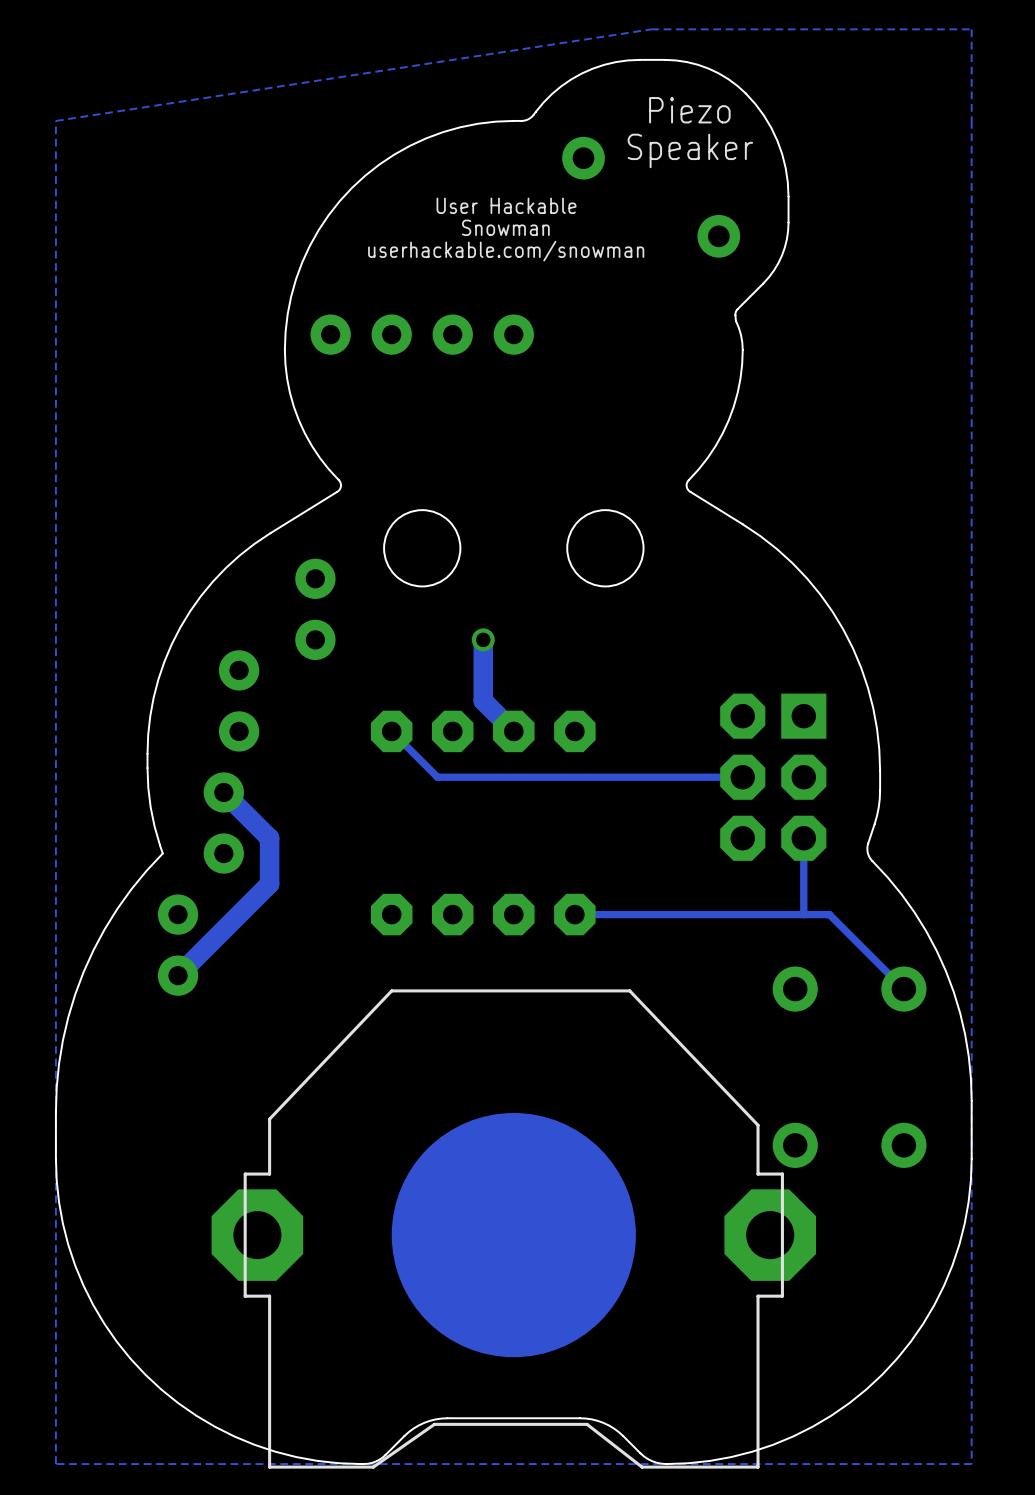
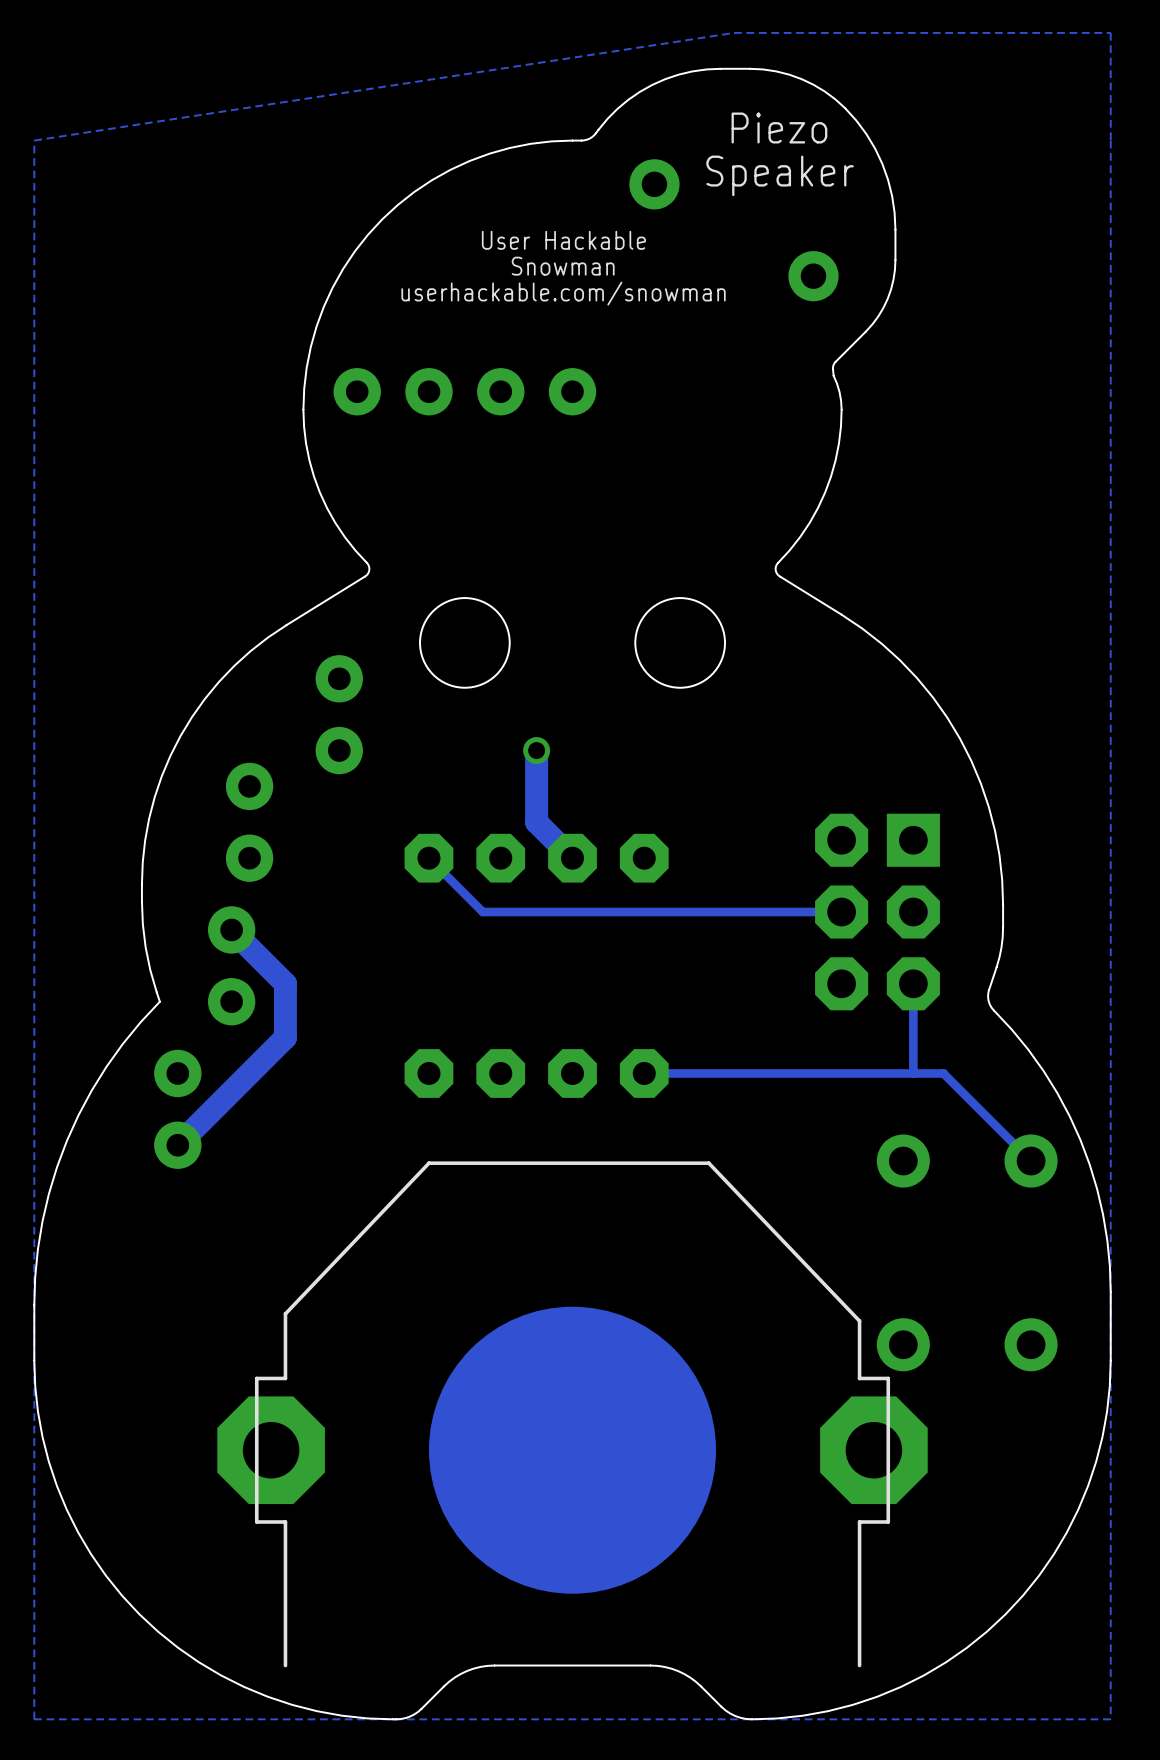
part: none -> (572, 1414)
part: (513, 1229) -> none

